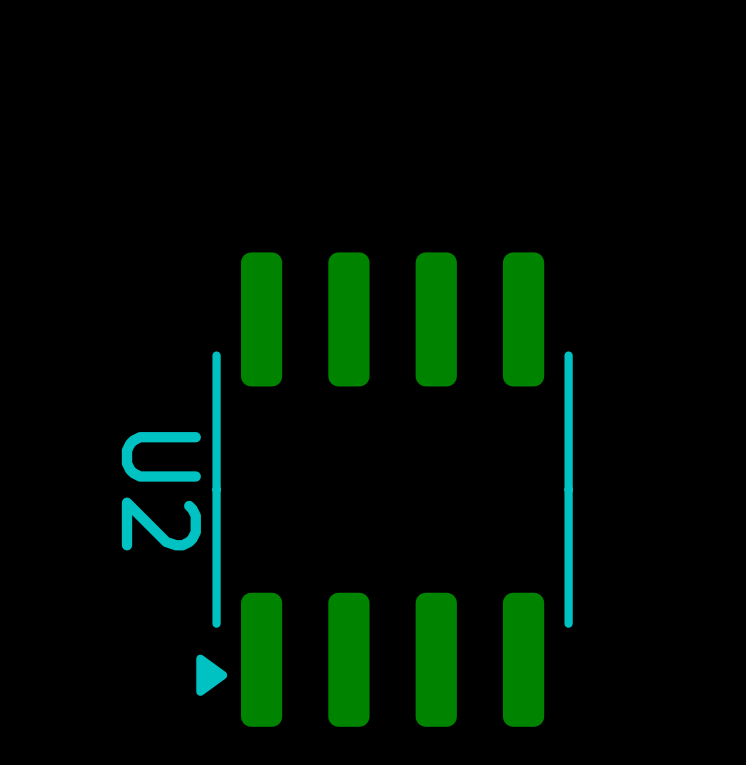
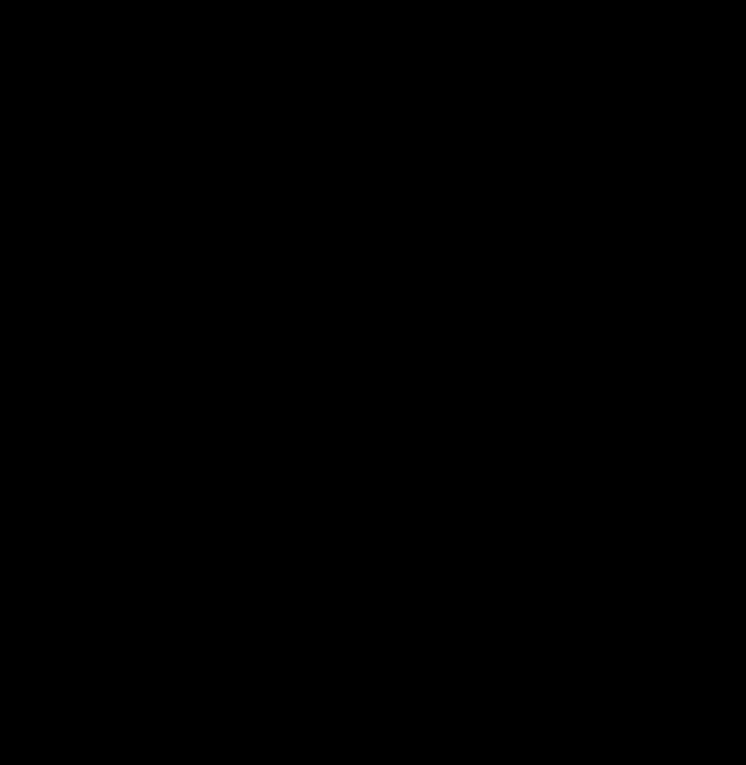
U2: (384, 489) -> none

